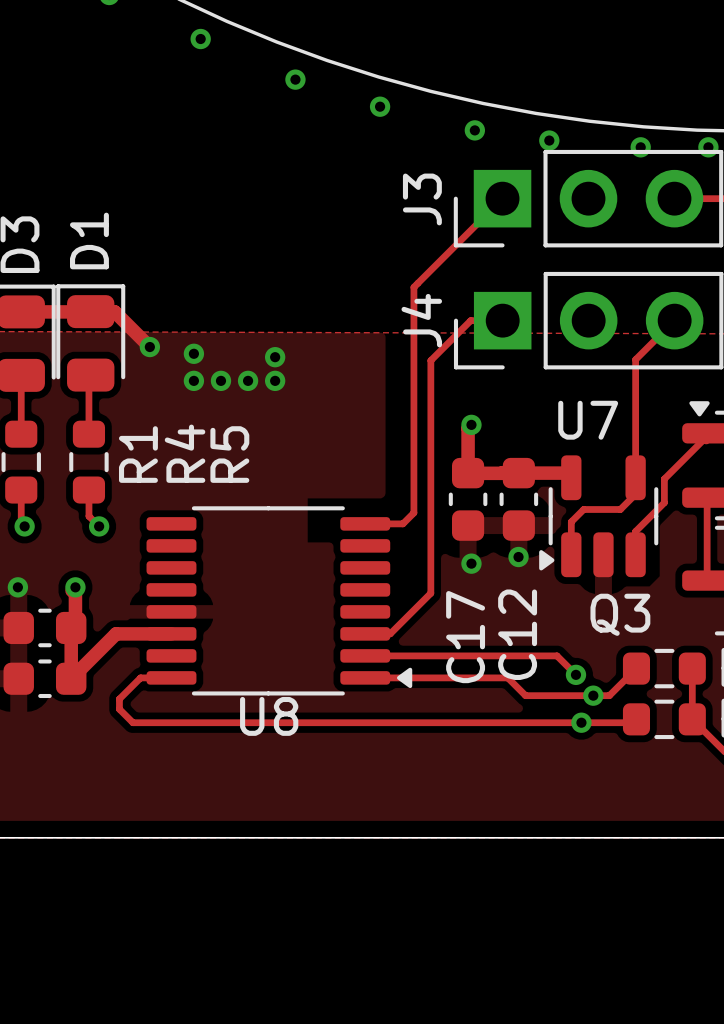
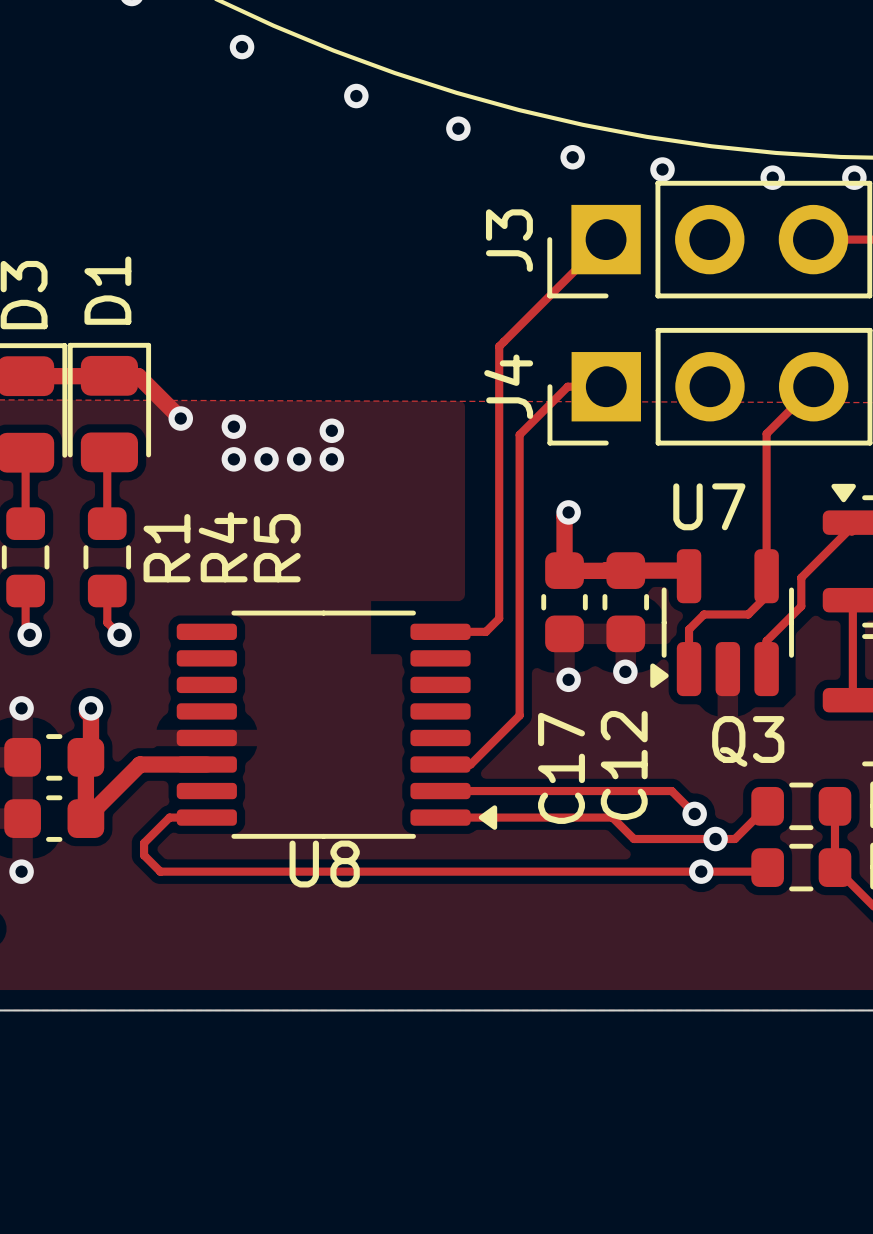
via: none -> (21, 871)

